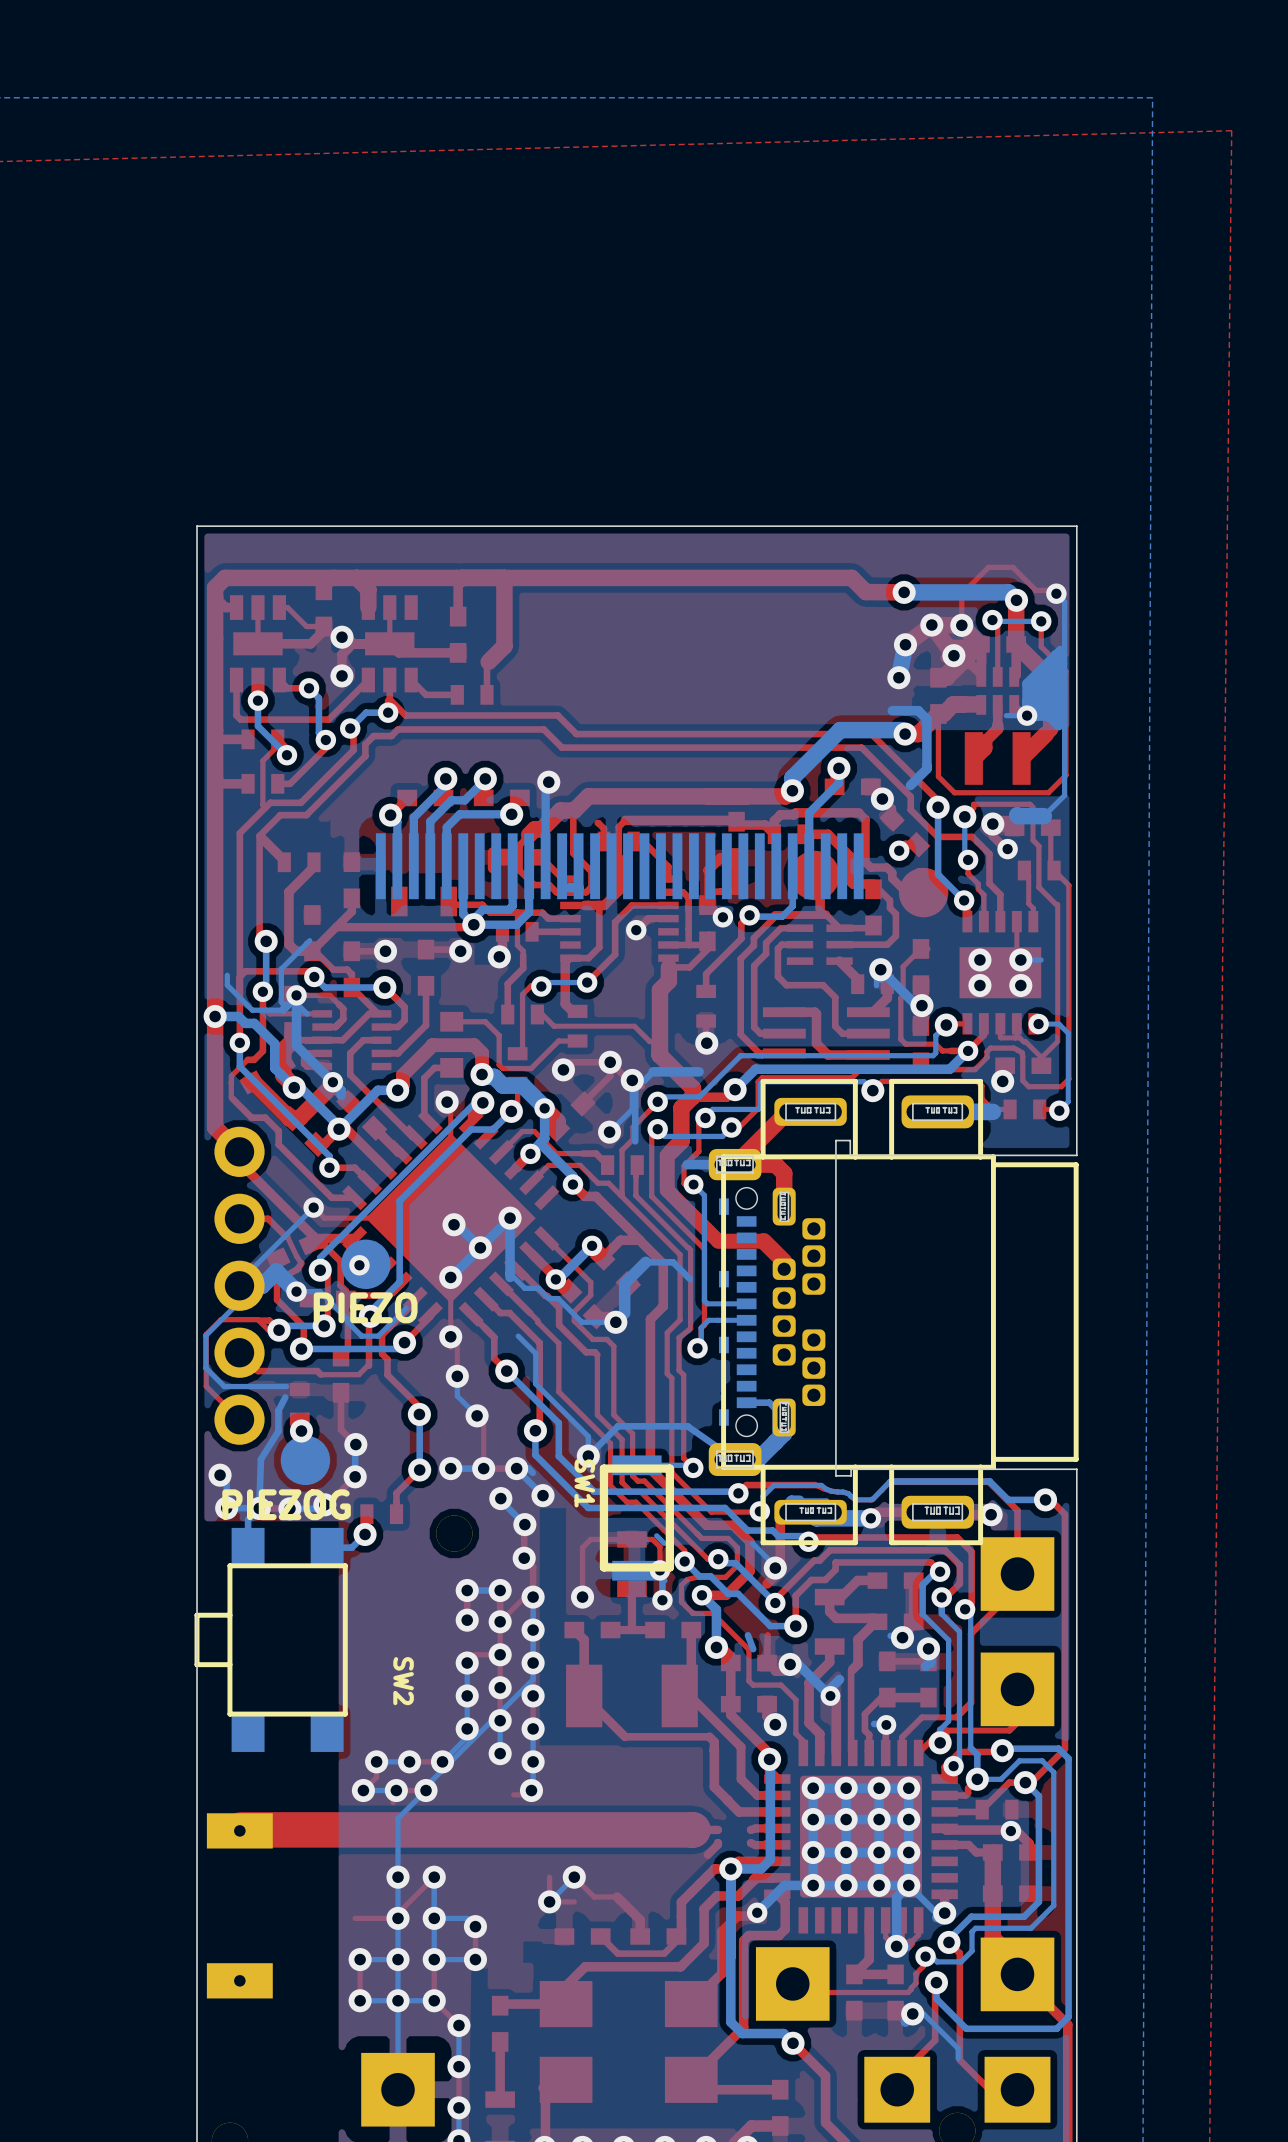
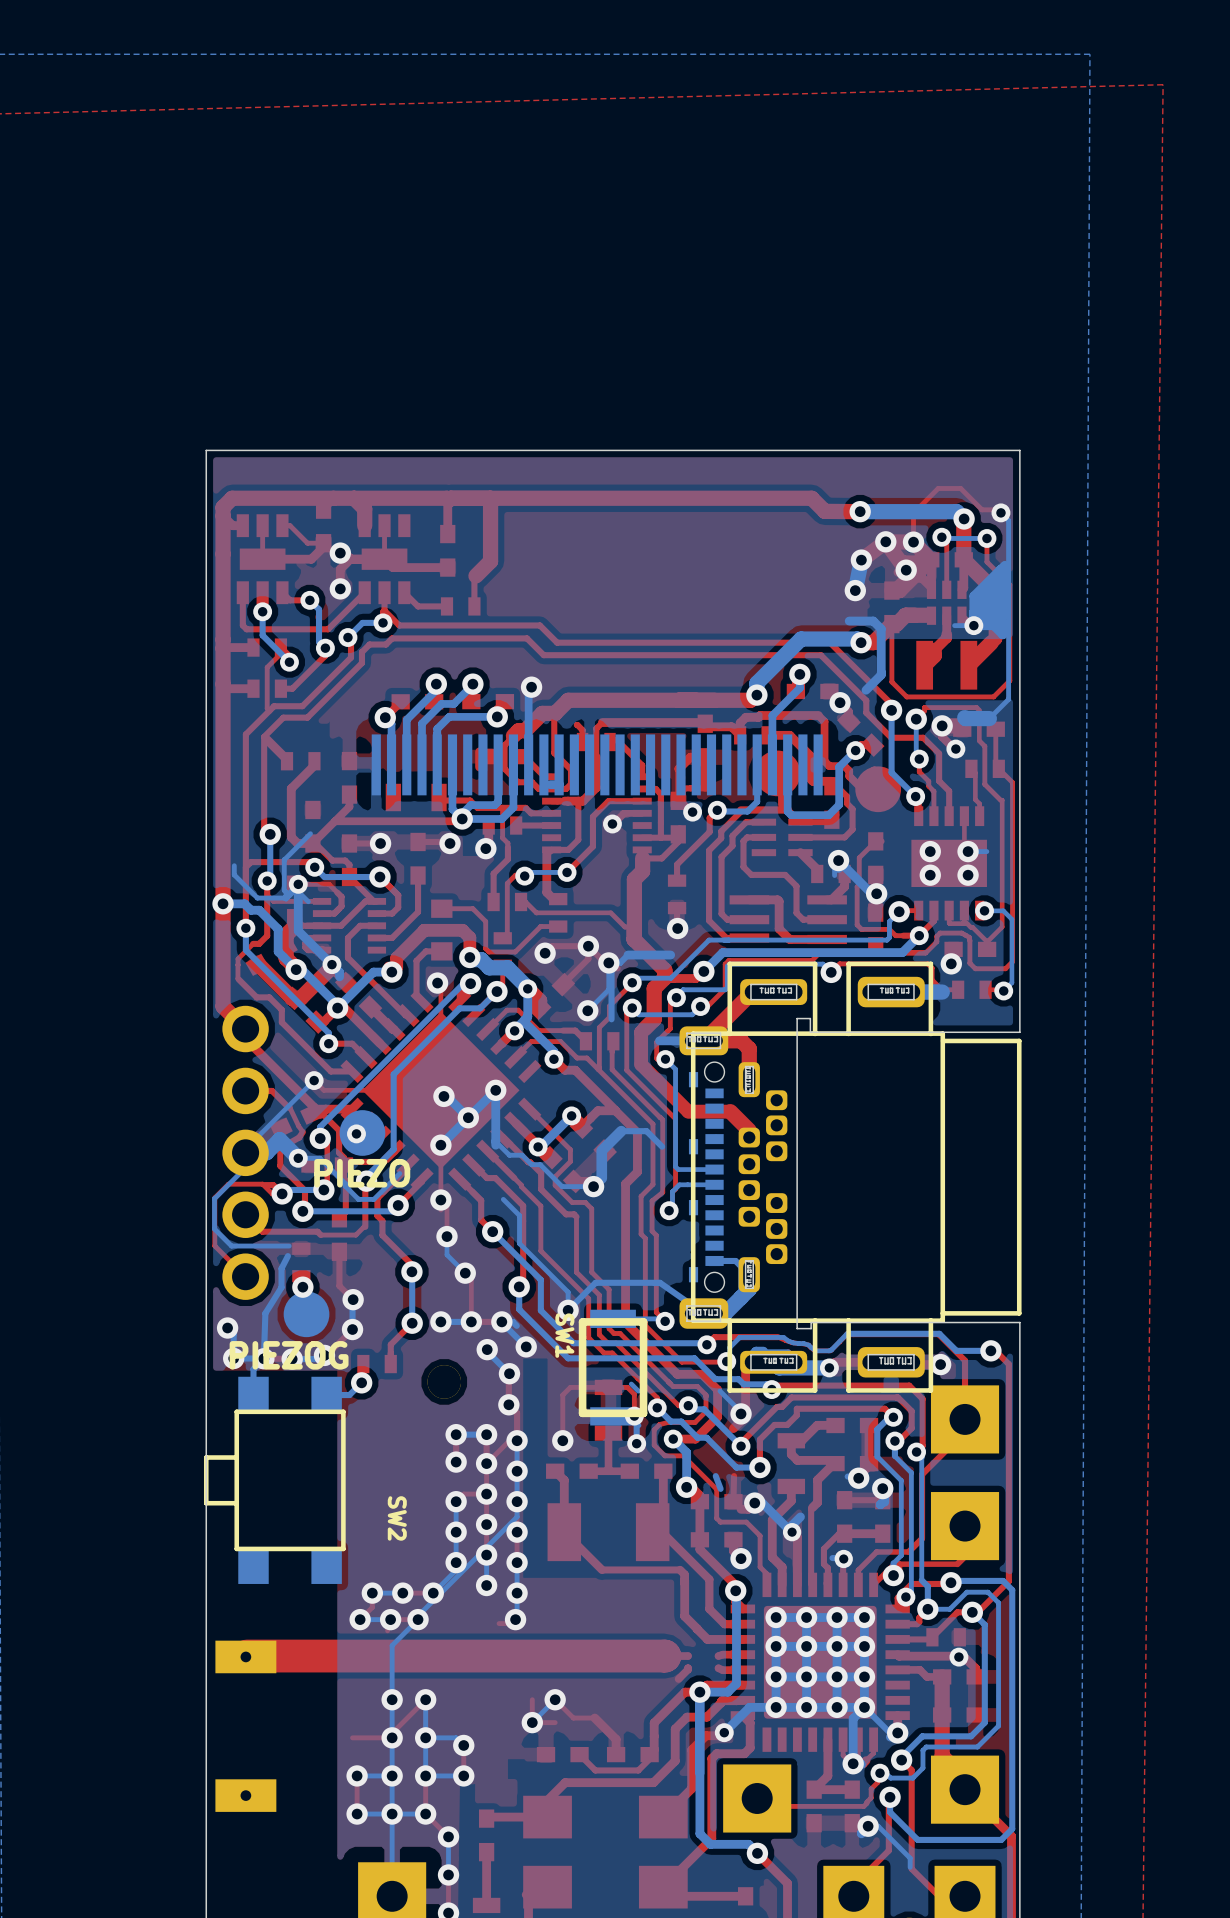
bottom track: none -> (855, 750) (839, 767) (839, 804) (828, 815) (791, 815) (787, 811) (787, 764)

